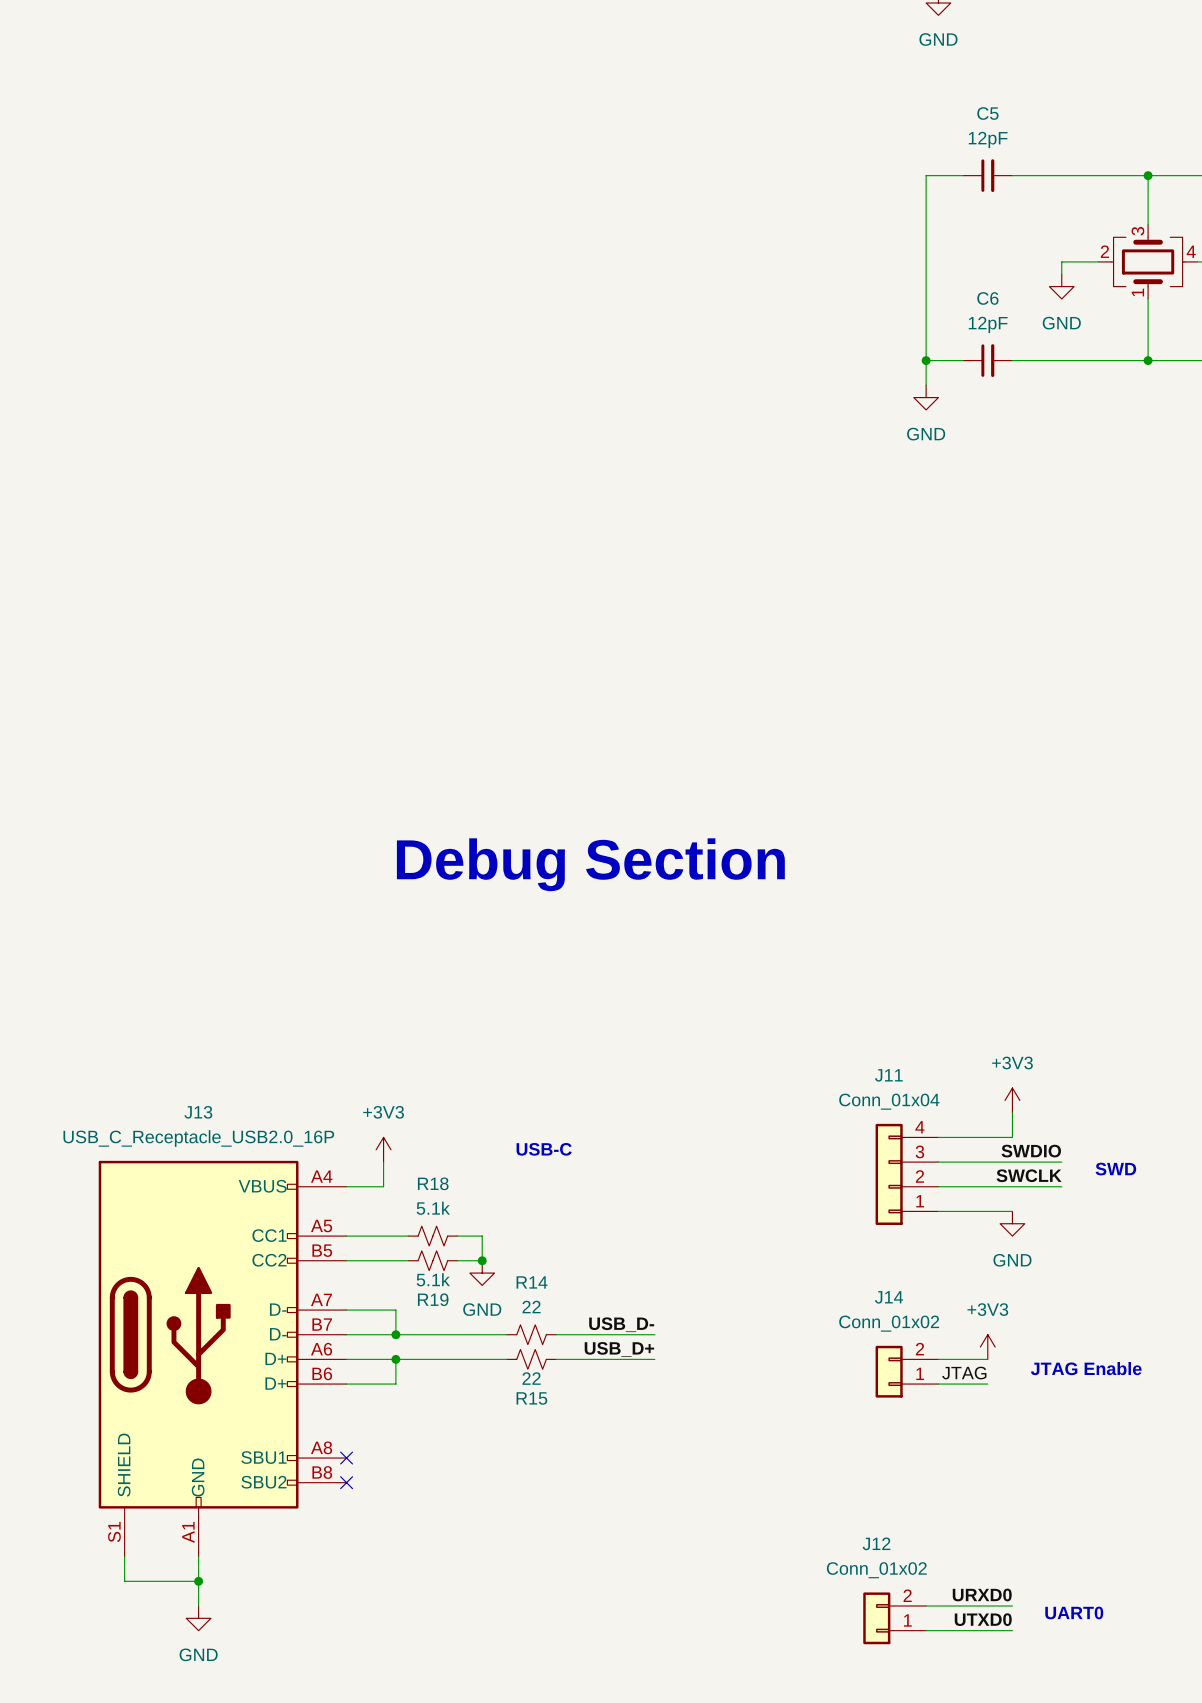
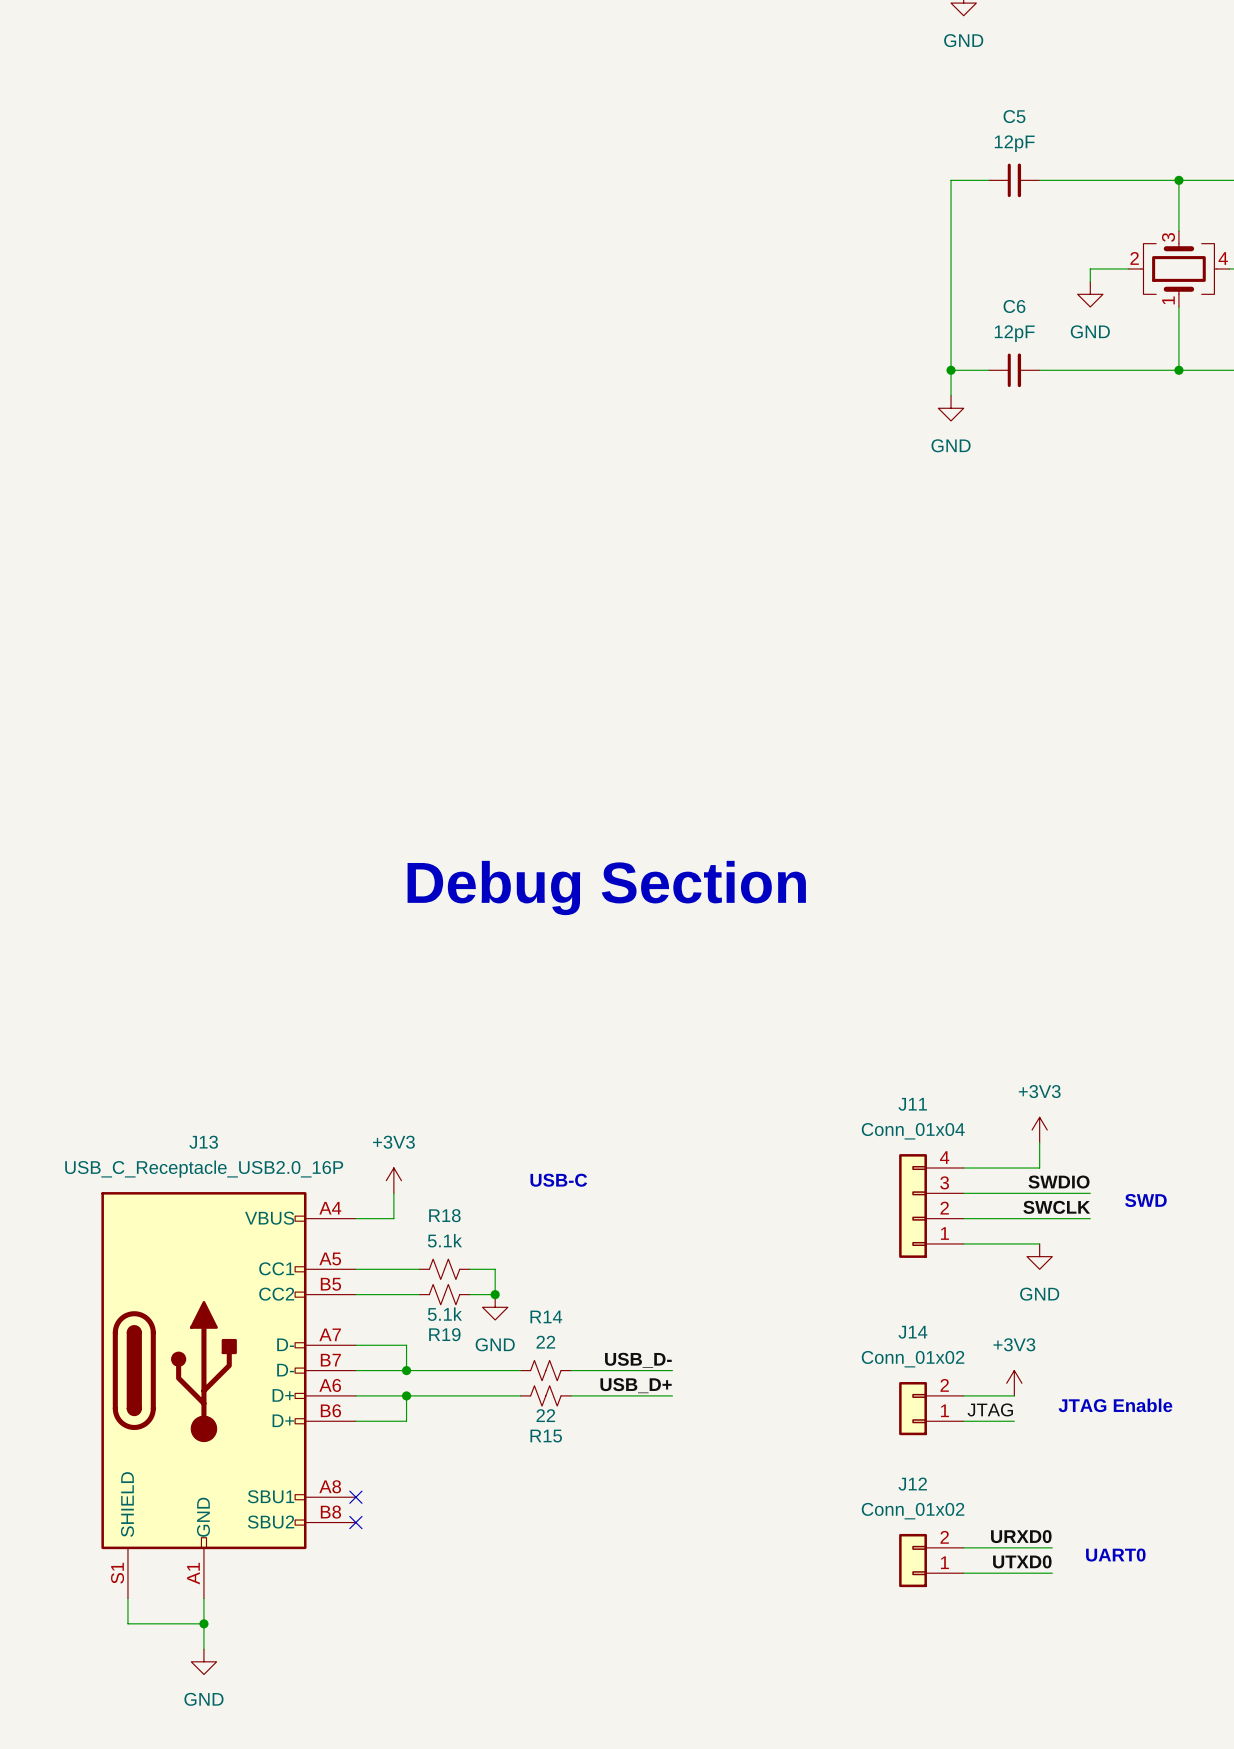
label position: URXD0 (982, 1594) -> URXD0 (1021, 1536)
wire: (926, 1605) (1012, 1605) -> (963, 1573) (1052, 1573)
text position: UART0 (1074, 1612) -> UART0 (1115, 1555)
J12 position: (894, 1618) -> (931, 1560)
label position: UTXD0 (983, 1619) -> UTXD0 (1022, 1561)
wire: (926, 1630) (1012, 1630) -> (963, 1547) (1052, 1547)

